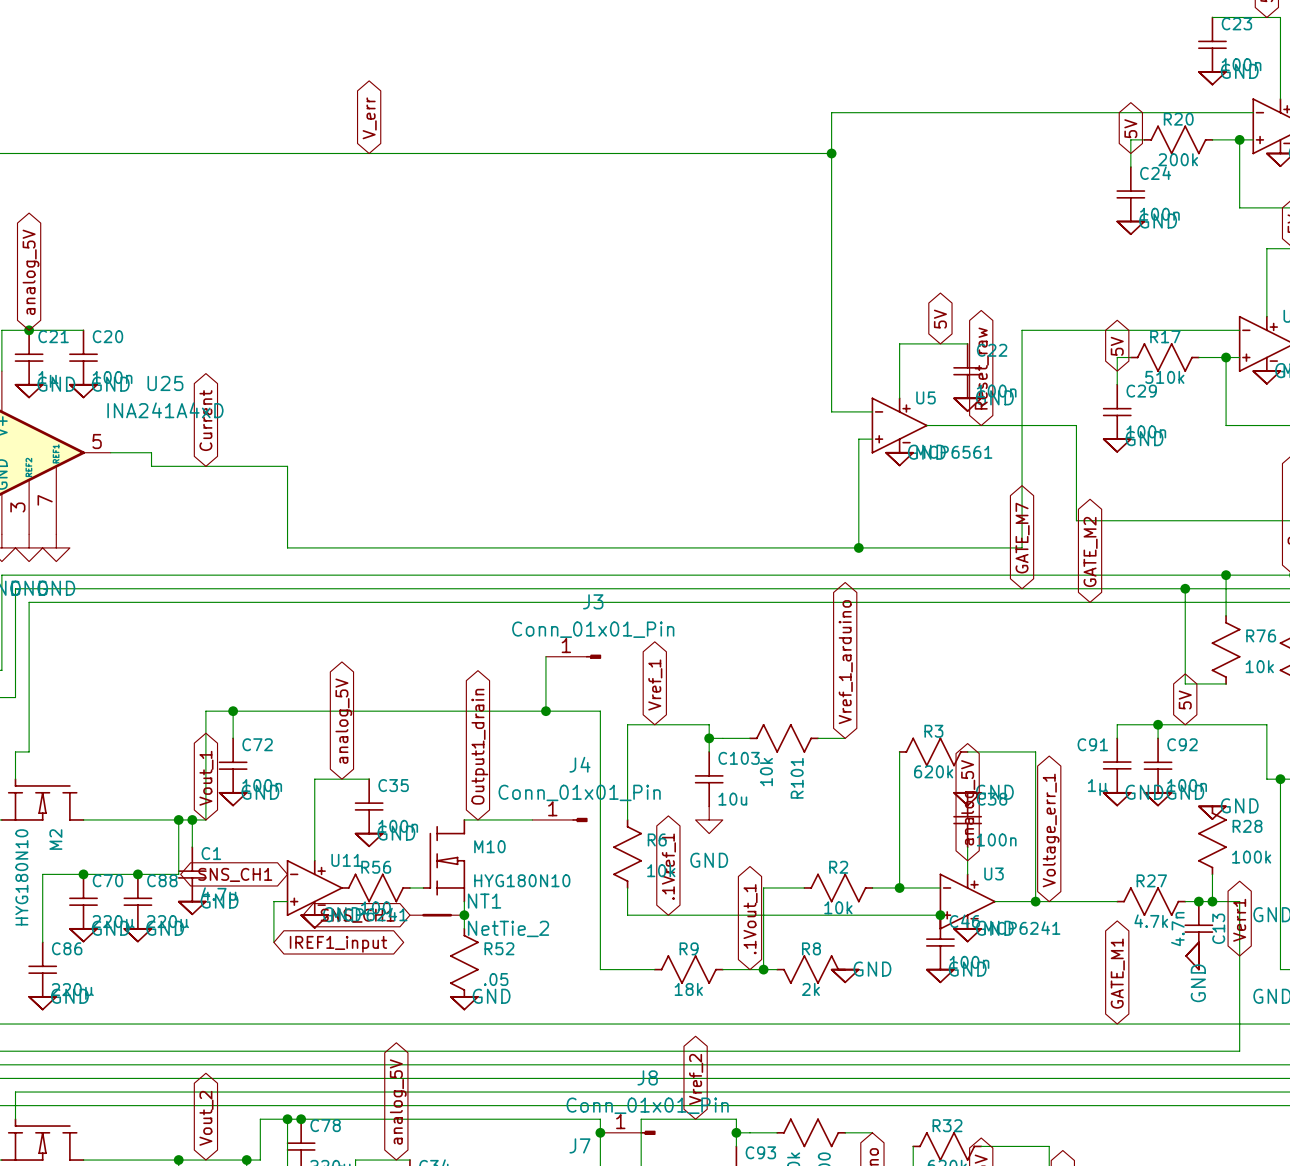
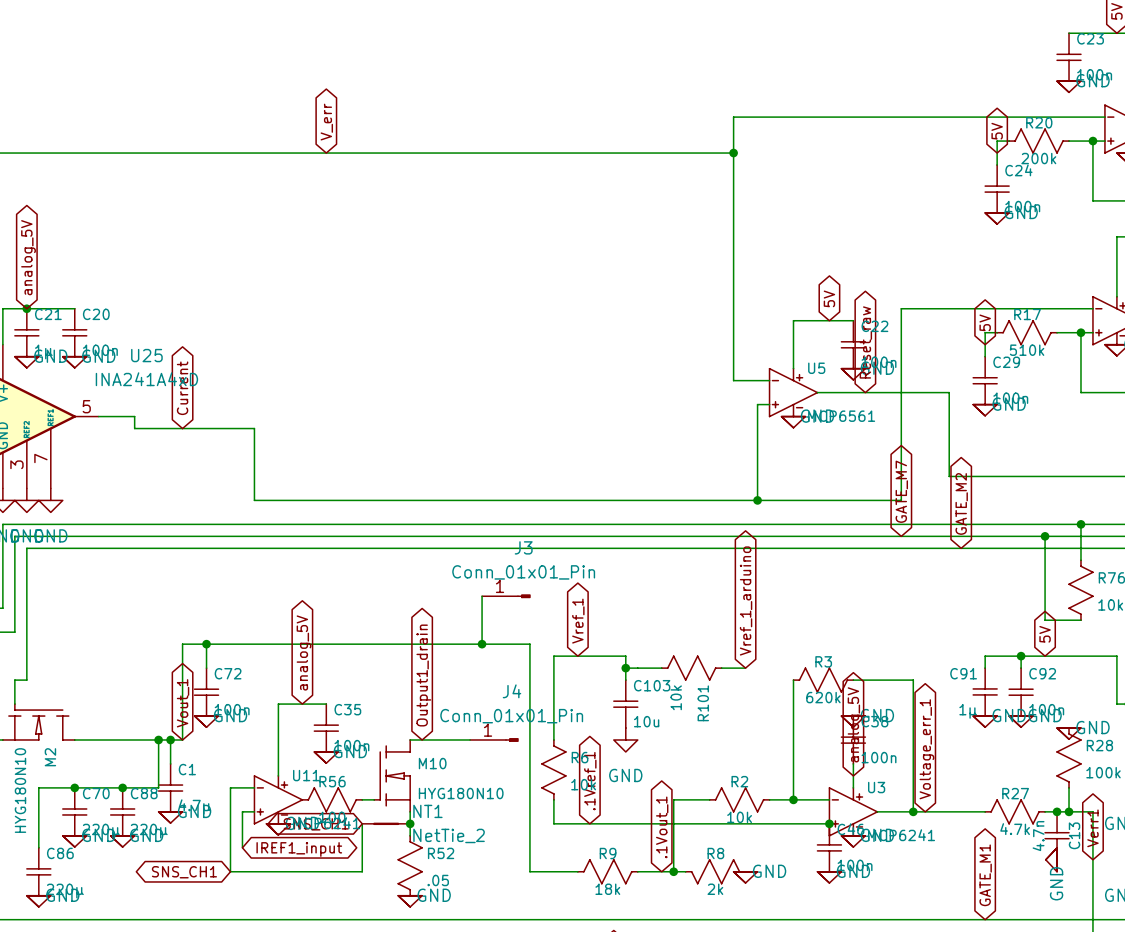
global label position: SNS_CH1 (235, 874) -> SNS_CH1 (184, 872)
wire: none -> (254, 787) (230, 787) (230, 871) (362, 871) (362, 823)

